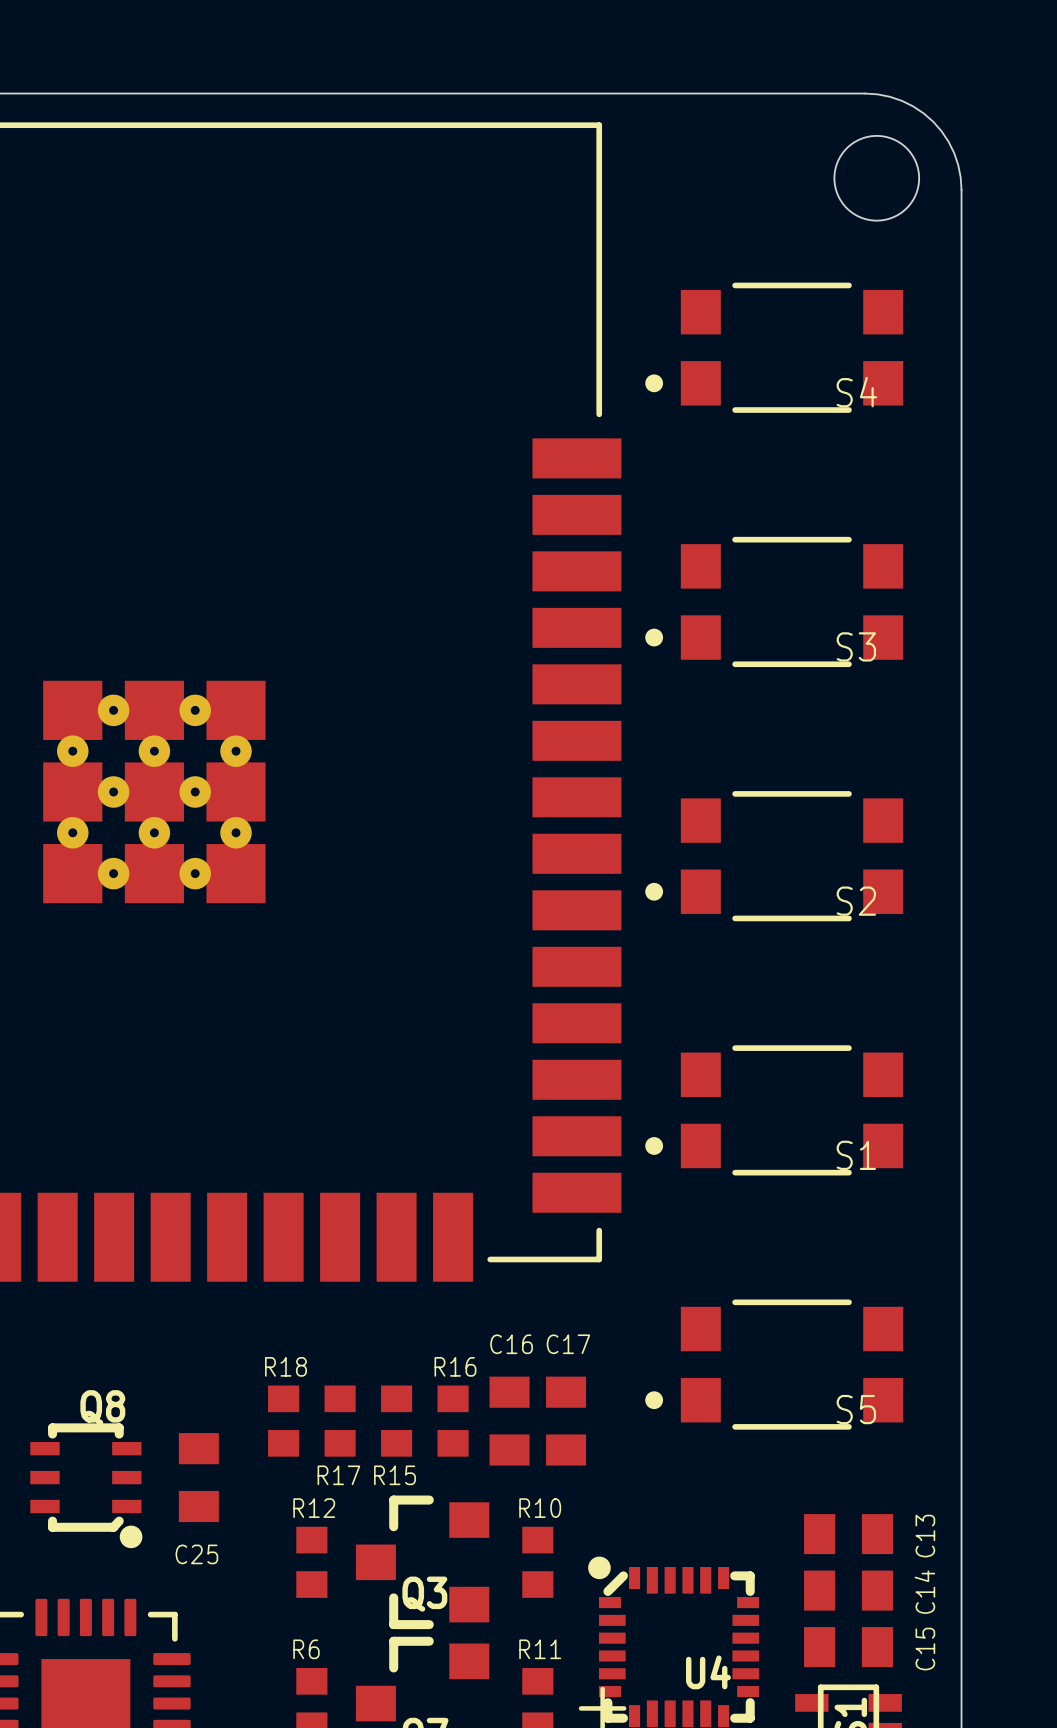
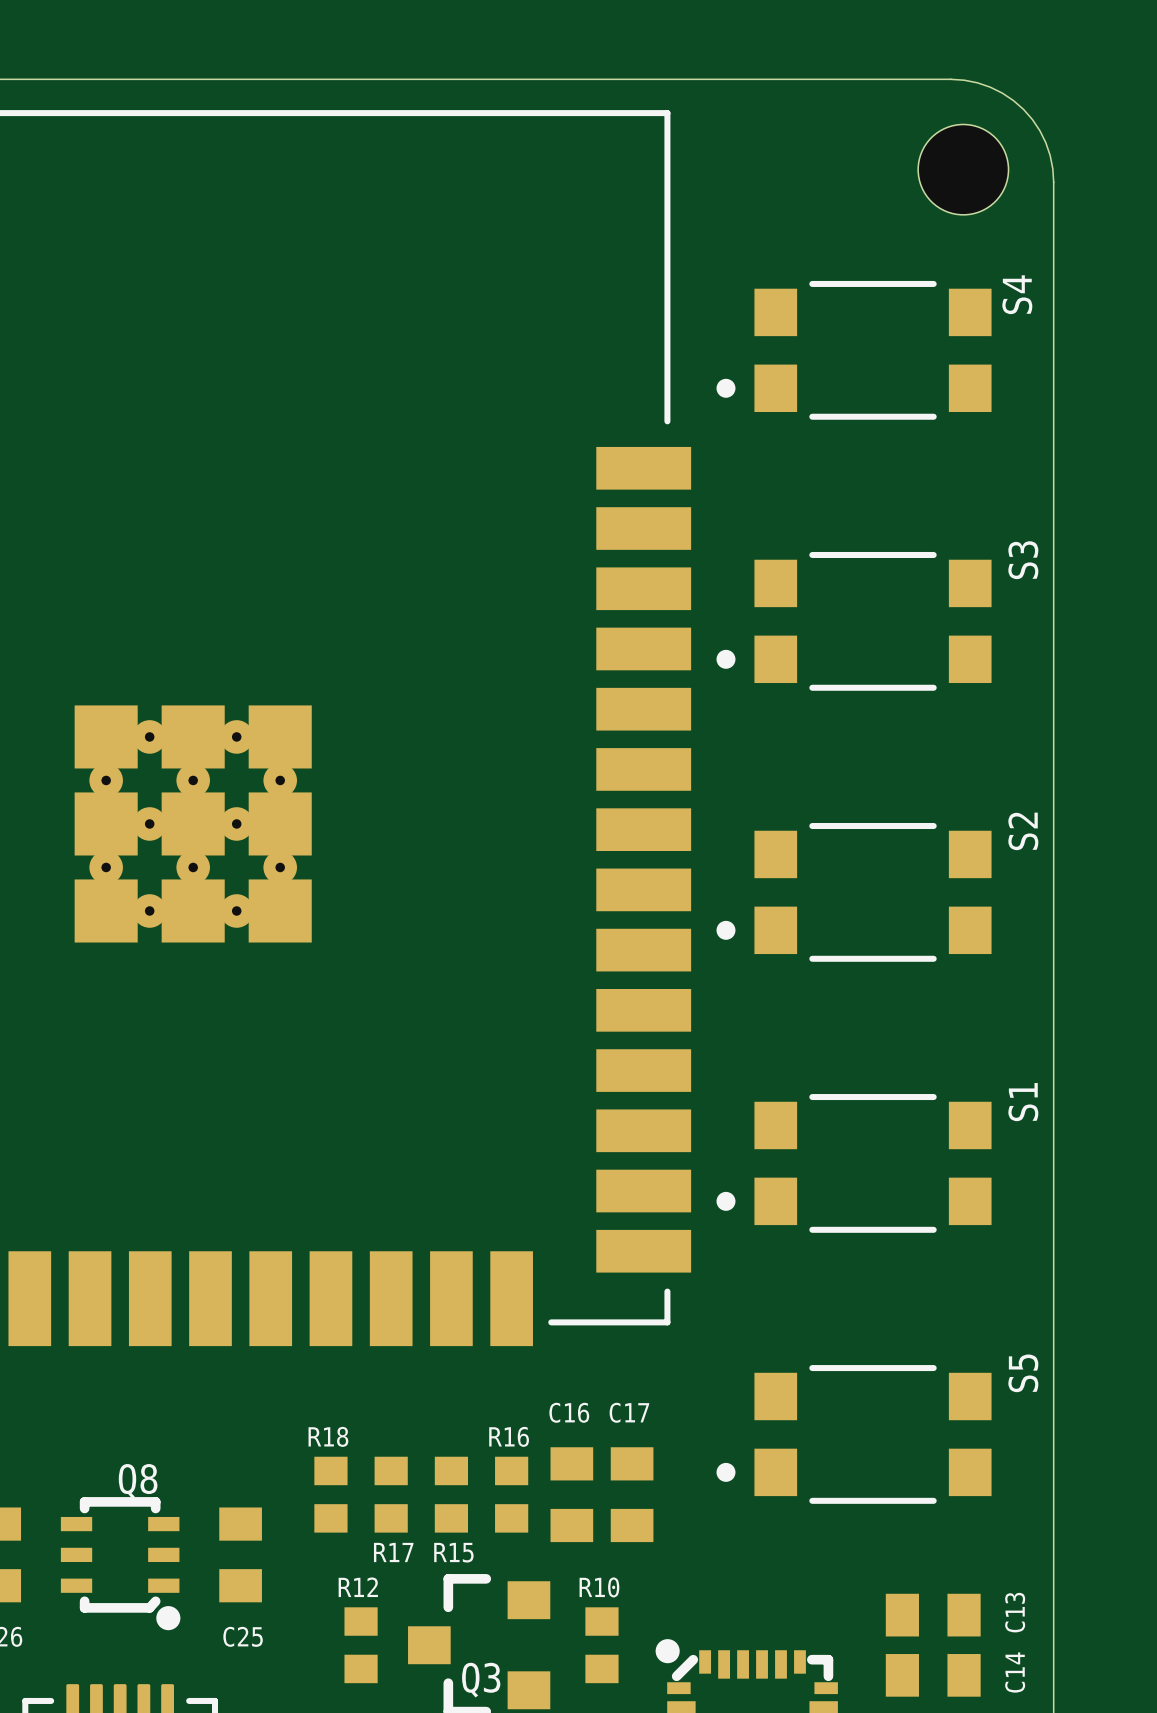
S4 name rotation: 0° (856, 392) -> 90° counterclockwise (1017, 294)
S4 name position: S4 (856, 392) -> S4 (1017, 294)
S3 name rotation: 0° (856, 646) -> 90° counterclockwise (1023, 560)
S3 name position: S3 (856, 646) -> S3 (1023, 560)
S2 name rotation: 0° (856, 901) -> 90° counterclockwise (1023, 831)
S2 name position: S2 (856, 901) -> S2 (1023, 831)
S1 name rotation: 0° (856, 1155) -> 90° counterclockwise (1023, 1102)
S1 name position: S1 (856, 1155) -> S1 (1023, 1102)
S5 name rotation: 0° (856, 1409) -> 90° counterclockwise (1023, 1373)
S5 name position: S5 (856, 1409) -> S5 (1023, 1373)

